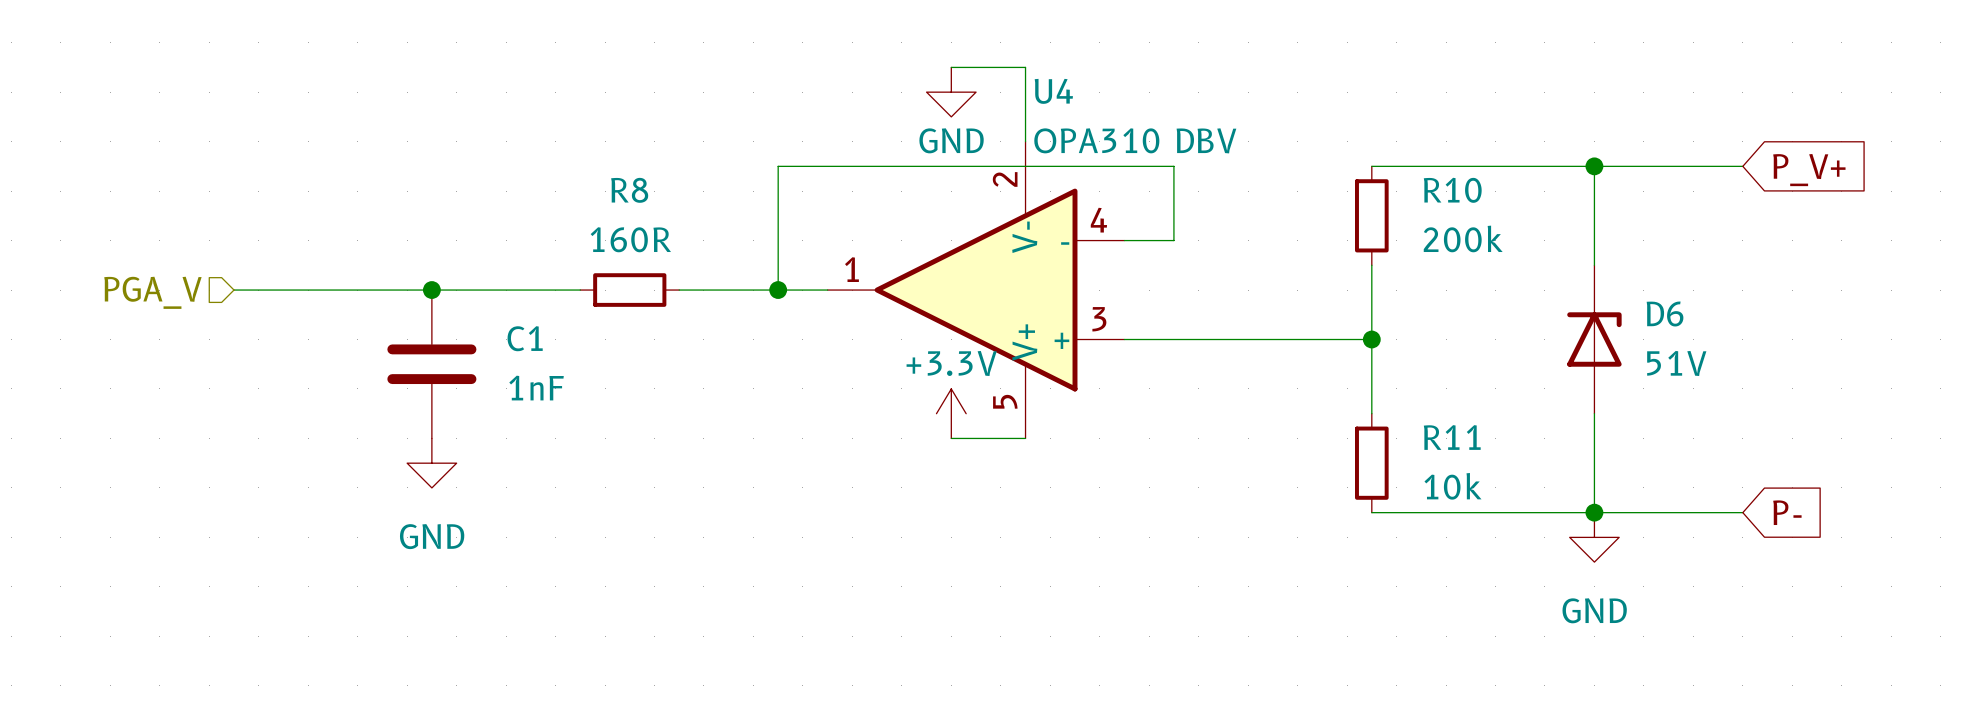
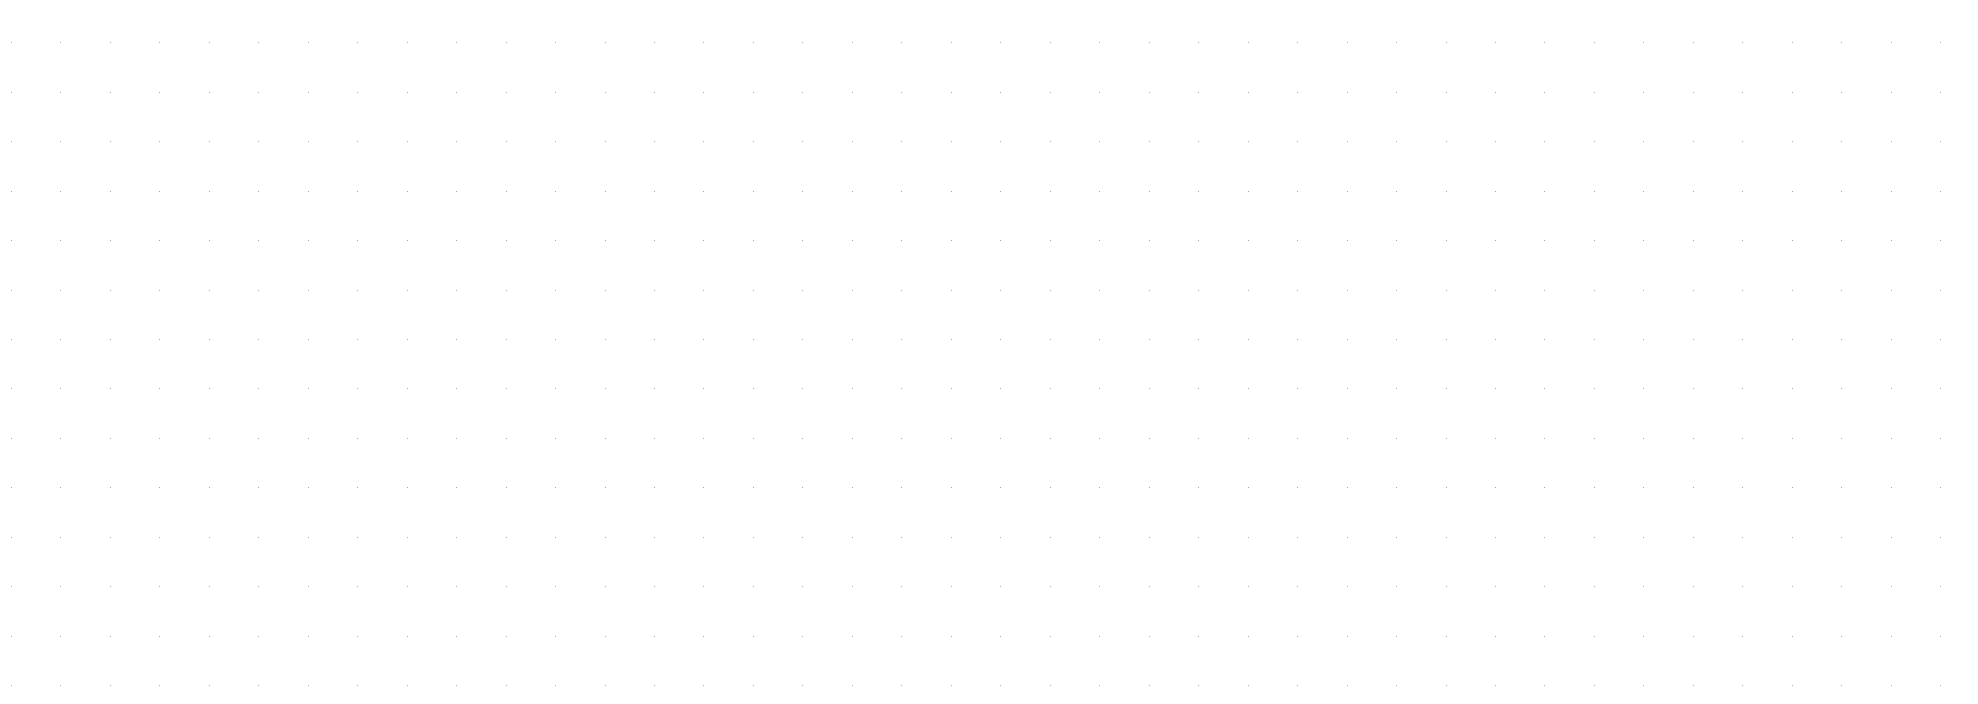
wire: (951, 67) (1025, 67) (1025, 141) -> none
power symbol: GND (951, 92) -> none
wire: (1371, 166) (1742, 166) -> none
wire: (1594, 166) (1594, 265) -> none
junction: (1594, 166) -> none
global label: P_V+ (1809, 170) -> none
R10: 200k (1371, 215) -> none
wire: (1124, 240) (1173, 240) (1173, 166) (778, 166) (778, 290) -> none
wire: (1371, 265) (1371, 413) -> none
wire: (234, 290) (580, 290) -> none
junction: (431, 290) -> none
R8: 160R (629, 290) -> none
wire: (679, 290) (827, 290) -> none
junction: (778, 290) -> none
U4: OPA310 DBV (976, 290) -> none
hierarchical label: PGA_V (152, 292) -> none
wire: (1124, 339) (1371, 339) -> none
junction: (1371, 339) -> none
D6: 51V (1594, 339) -> none
C1: 1nF (431, 364) -> none
power symbol: +3.3V (951, 413) -> none
wire: (1594, 413) (1594, 512) -> none
wire: (951, 438) (1025, 438) -> none
power symbol: GND (431, 463) -> none
R11: 10k (1371, 463) -> none
wire: (1371, 512) (1742, 512) -> none
junction: (1594, 512) -> none
global label: P- (1787, 512) -> none
power symbol: GND (1594, 537) -> none

